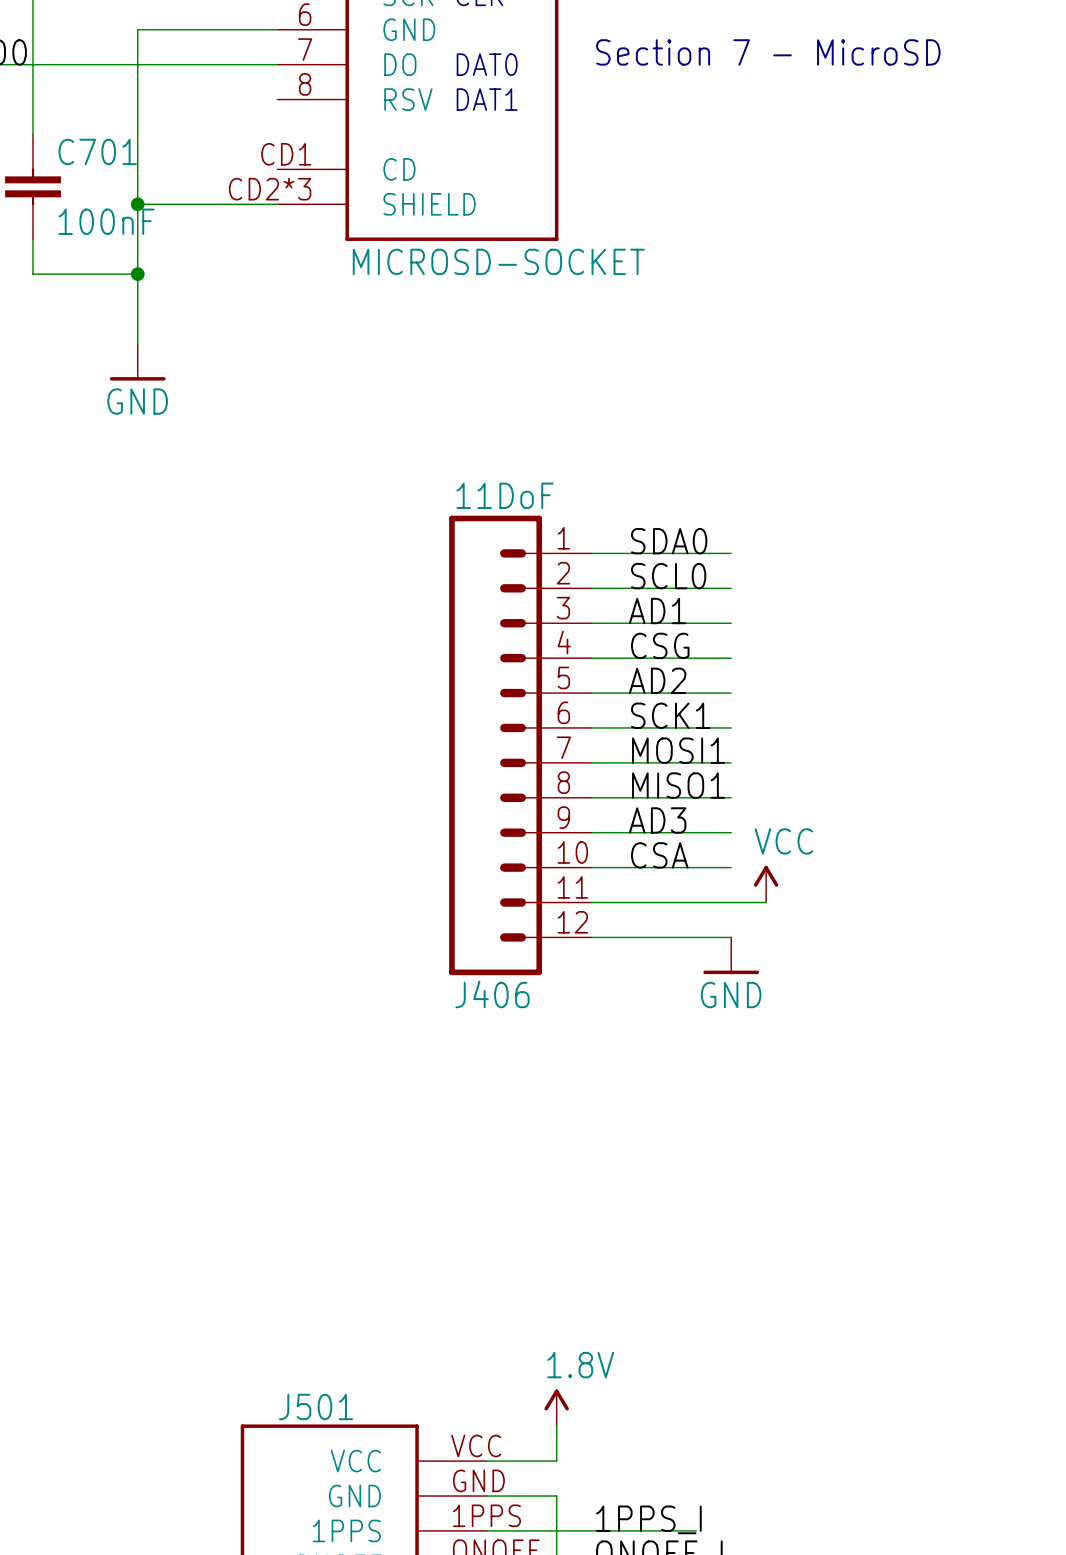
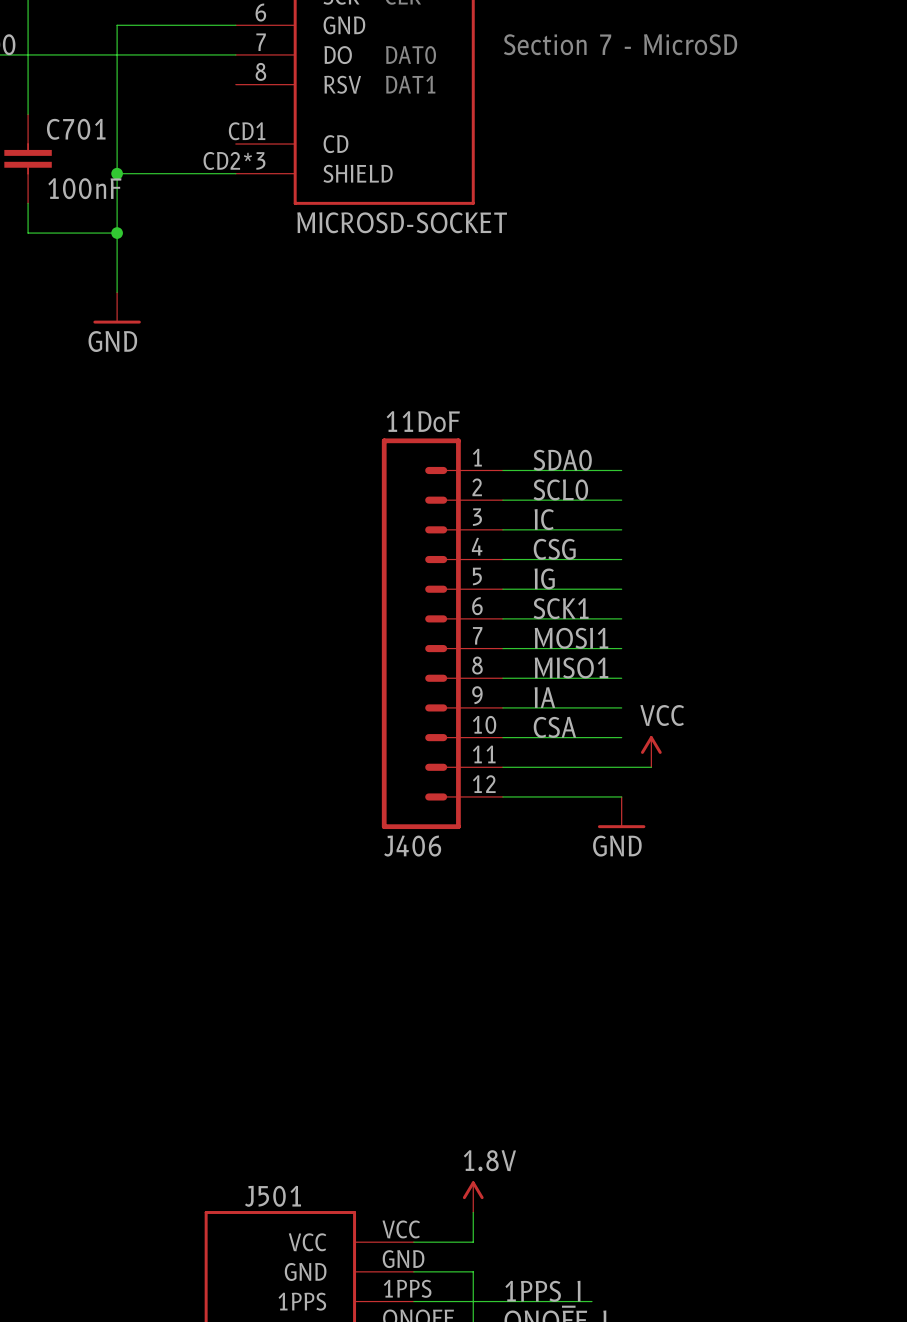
label: AD1 (657, 611) -> IC (544, 519)
label: AD2 (657, 680) -> IG (544, 578)
label: AD3 (657, 820) -> IA (544, 697)

